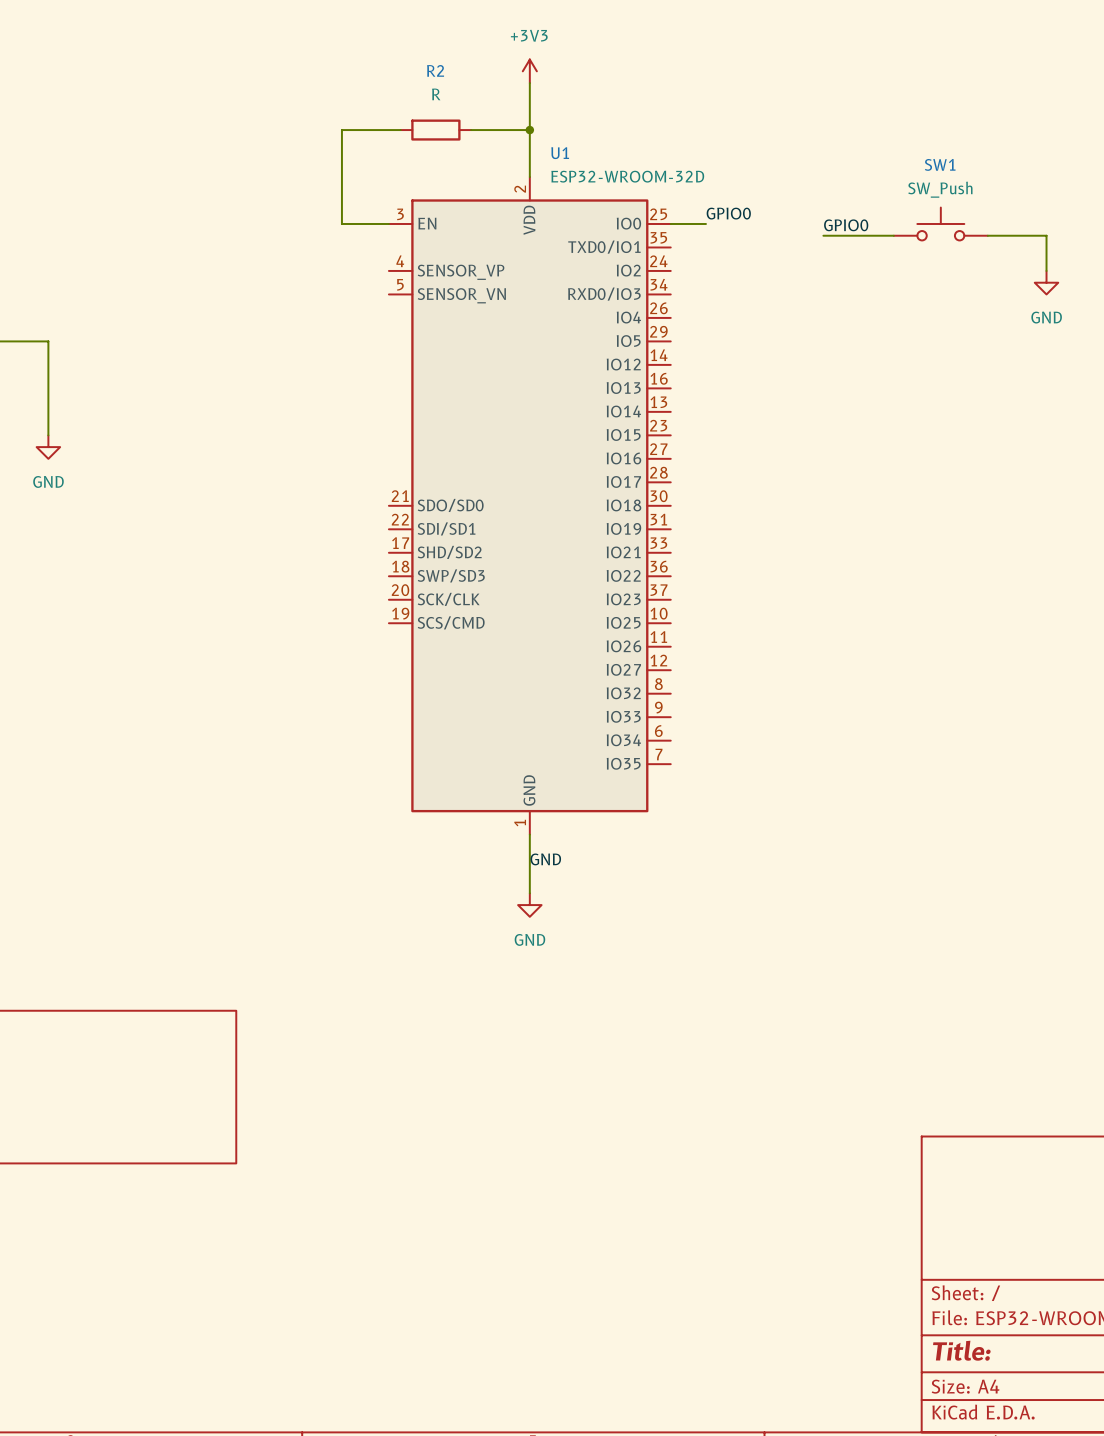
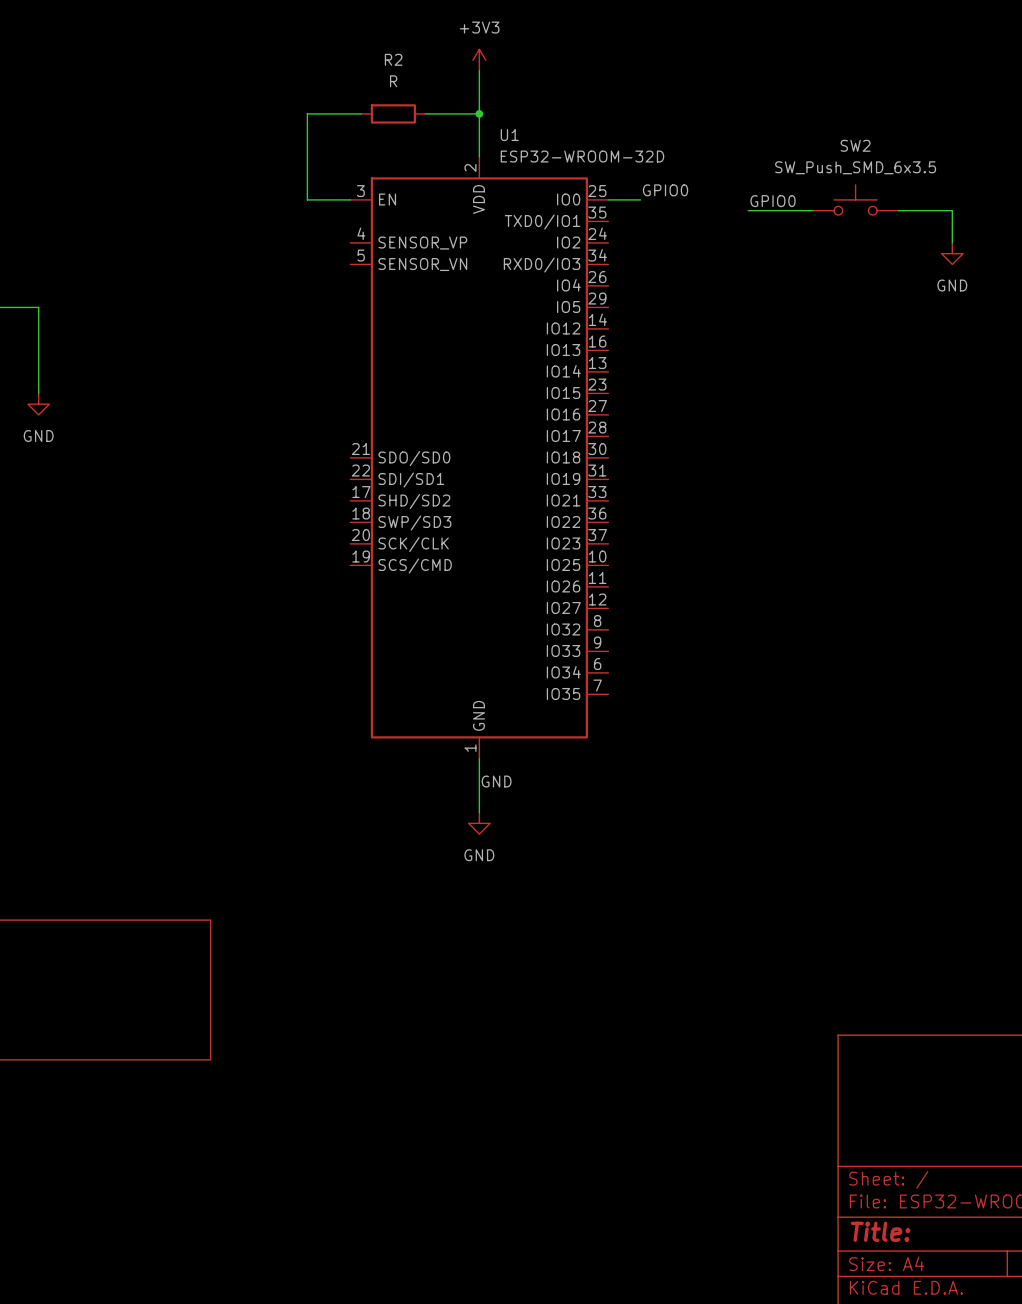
SW1 name: SW1 (940, 164) -> SW2 (855, 145)
SW1 value: SW_Push (940, 189) -> SW_Push_SMD_6x3.5 (855, 167)

